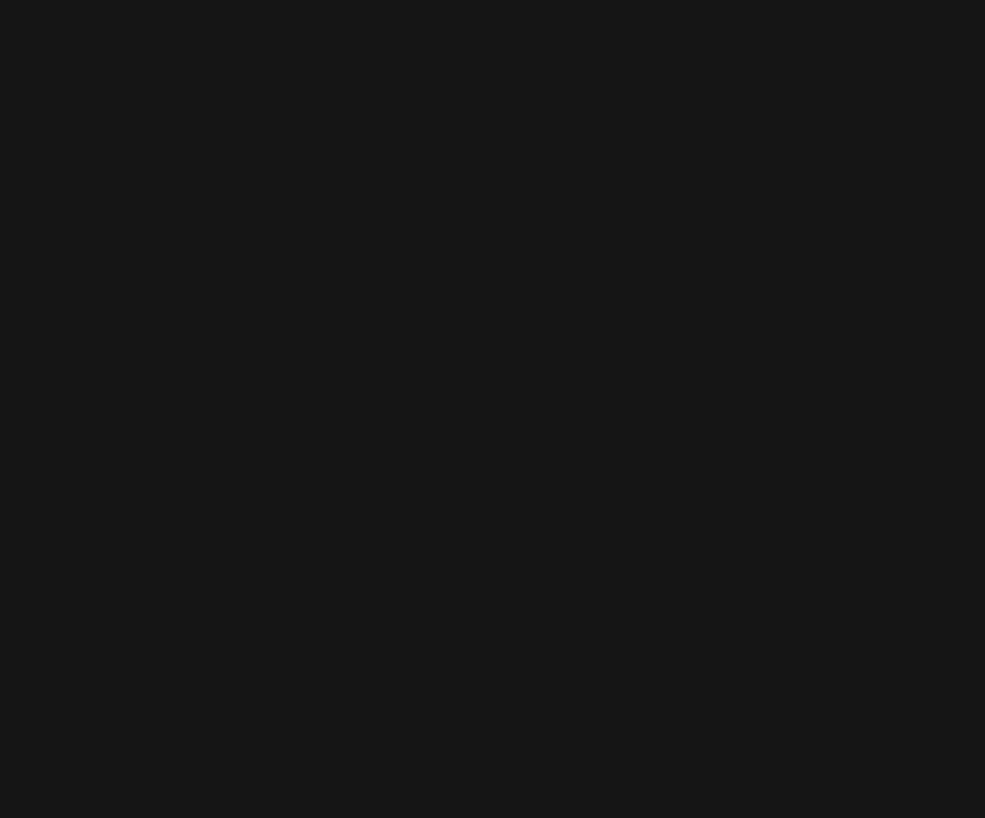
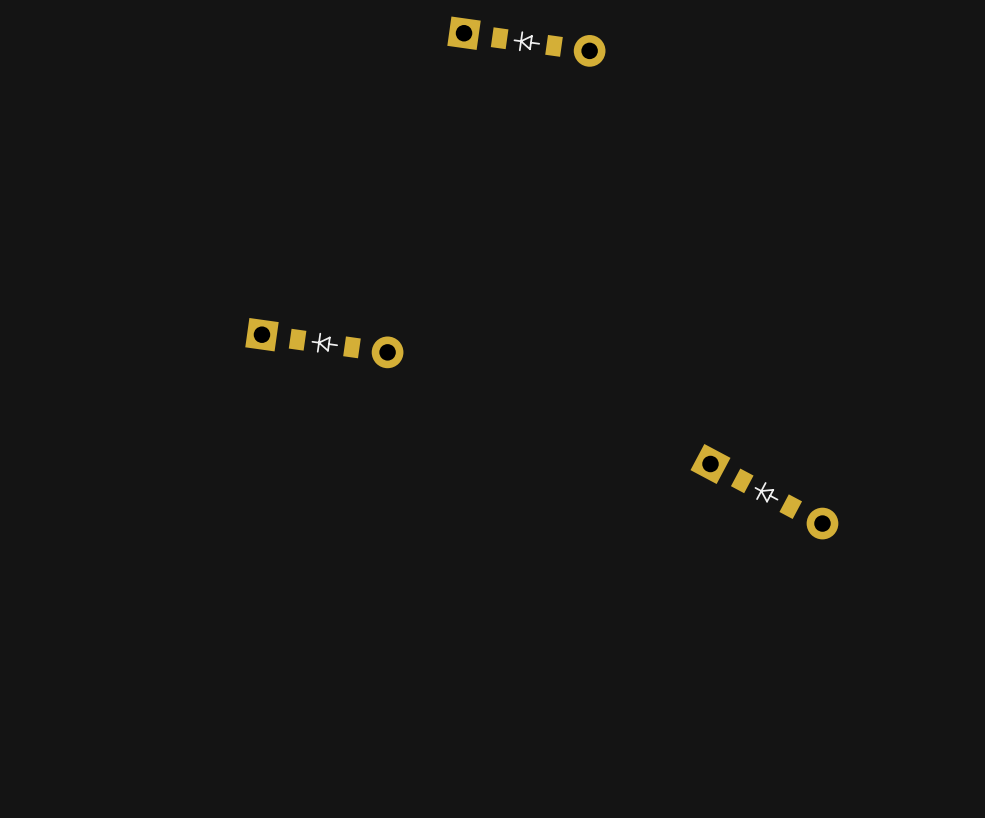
part: none -> (526, 41)
part: none -> (324, 343)
part: none -> (764, 491)

